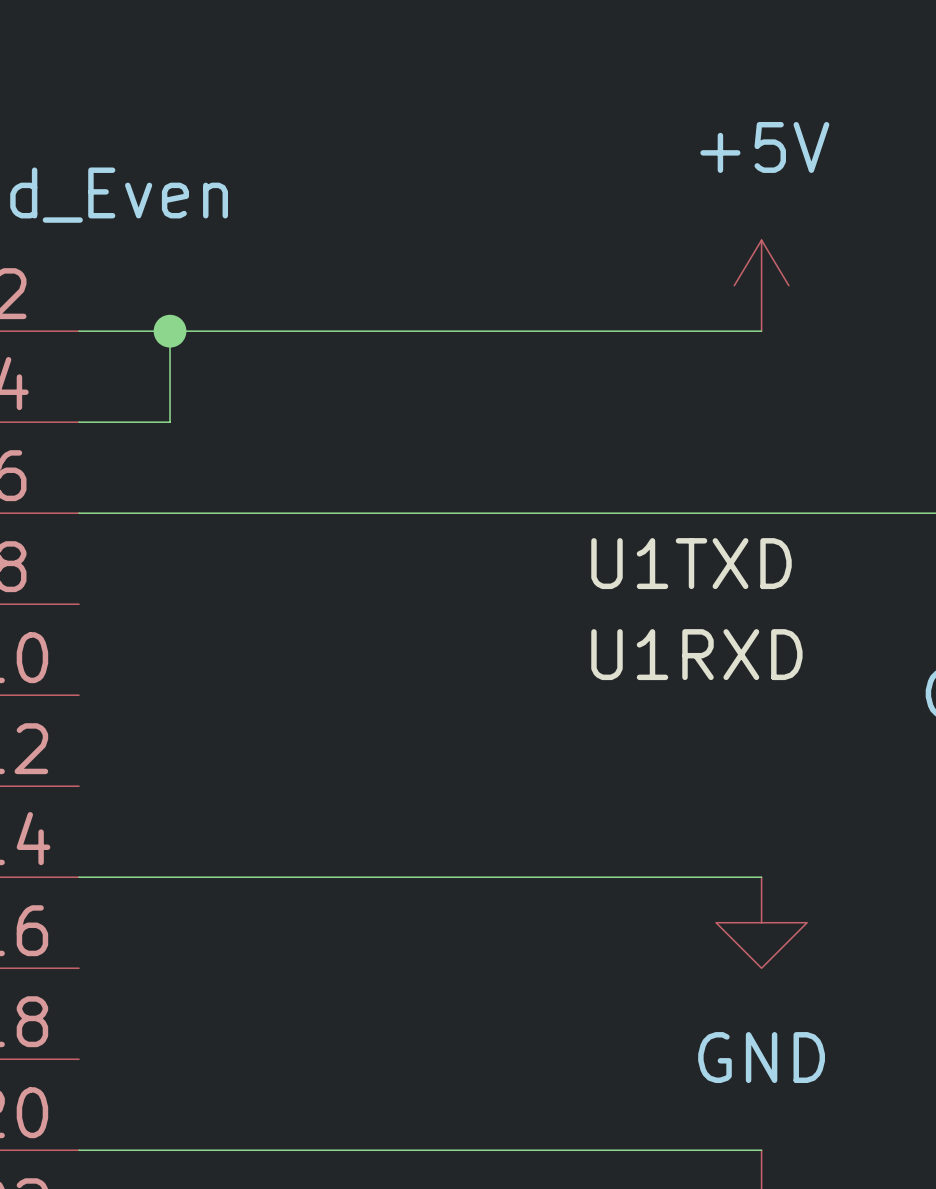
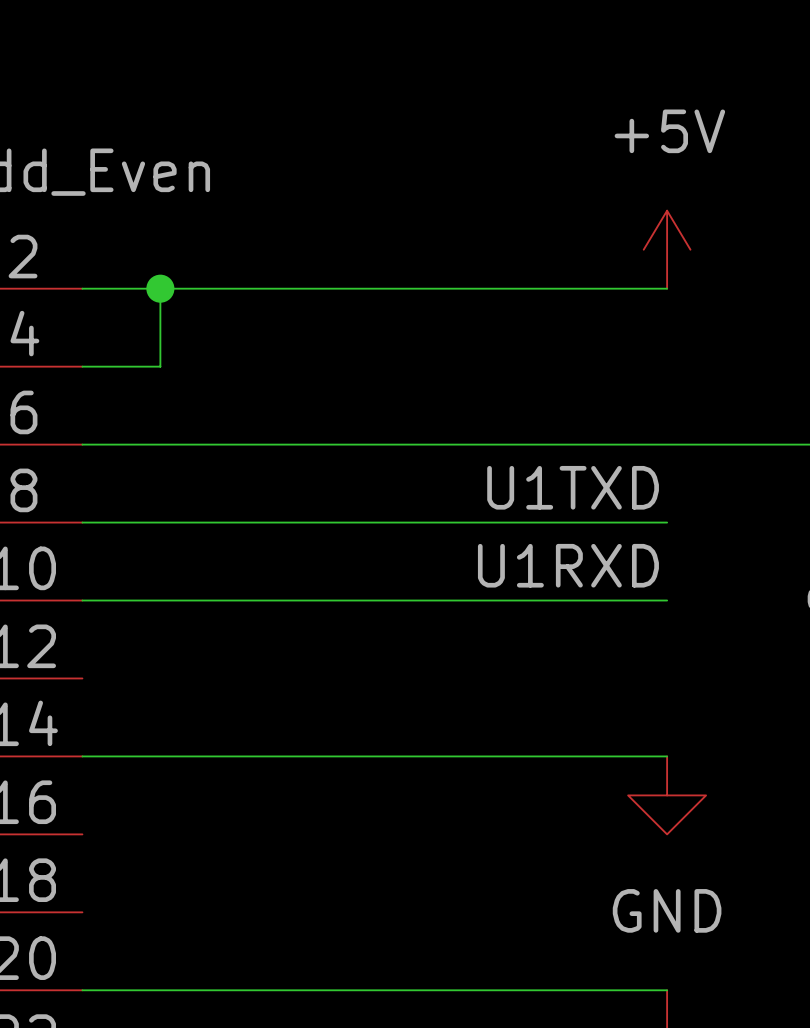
label position: U1TXD (691, 563) -> U1TXD (573, 487)
wire: none -> (82, 522) (667, 522)
label position: U1RXD (696, 654) -> U1RXD (568, 565)
wire: none -> (82, 600) (667, 600)

